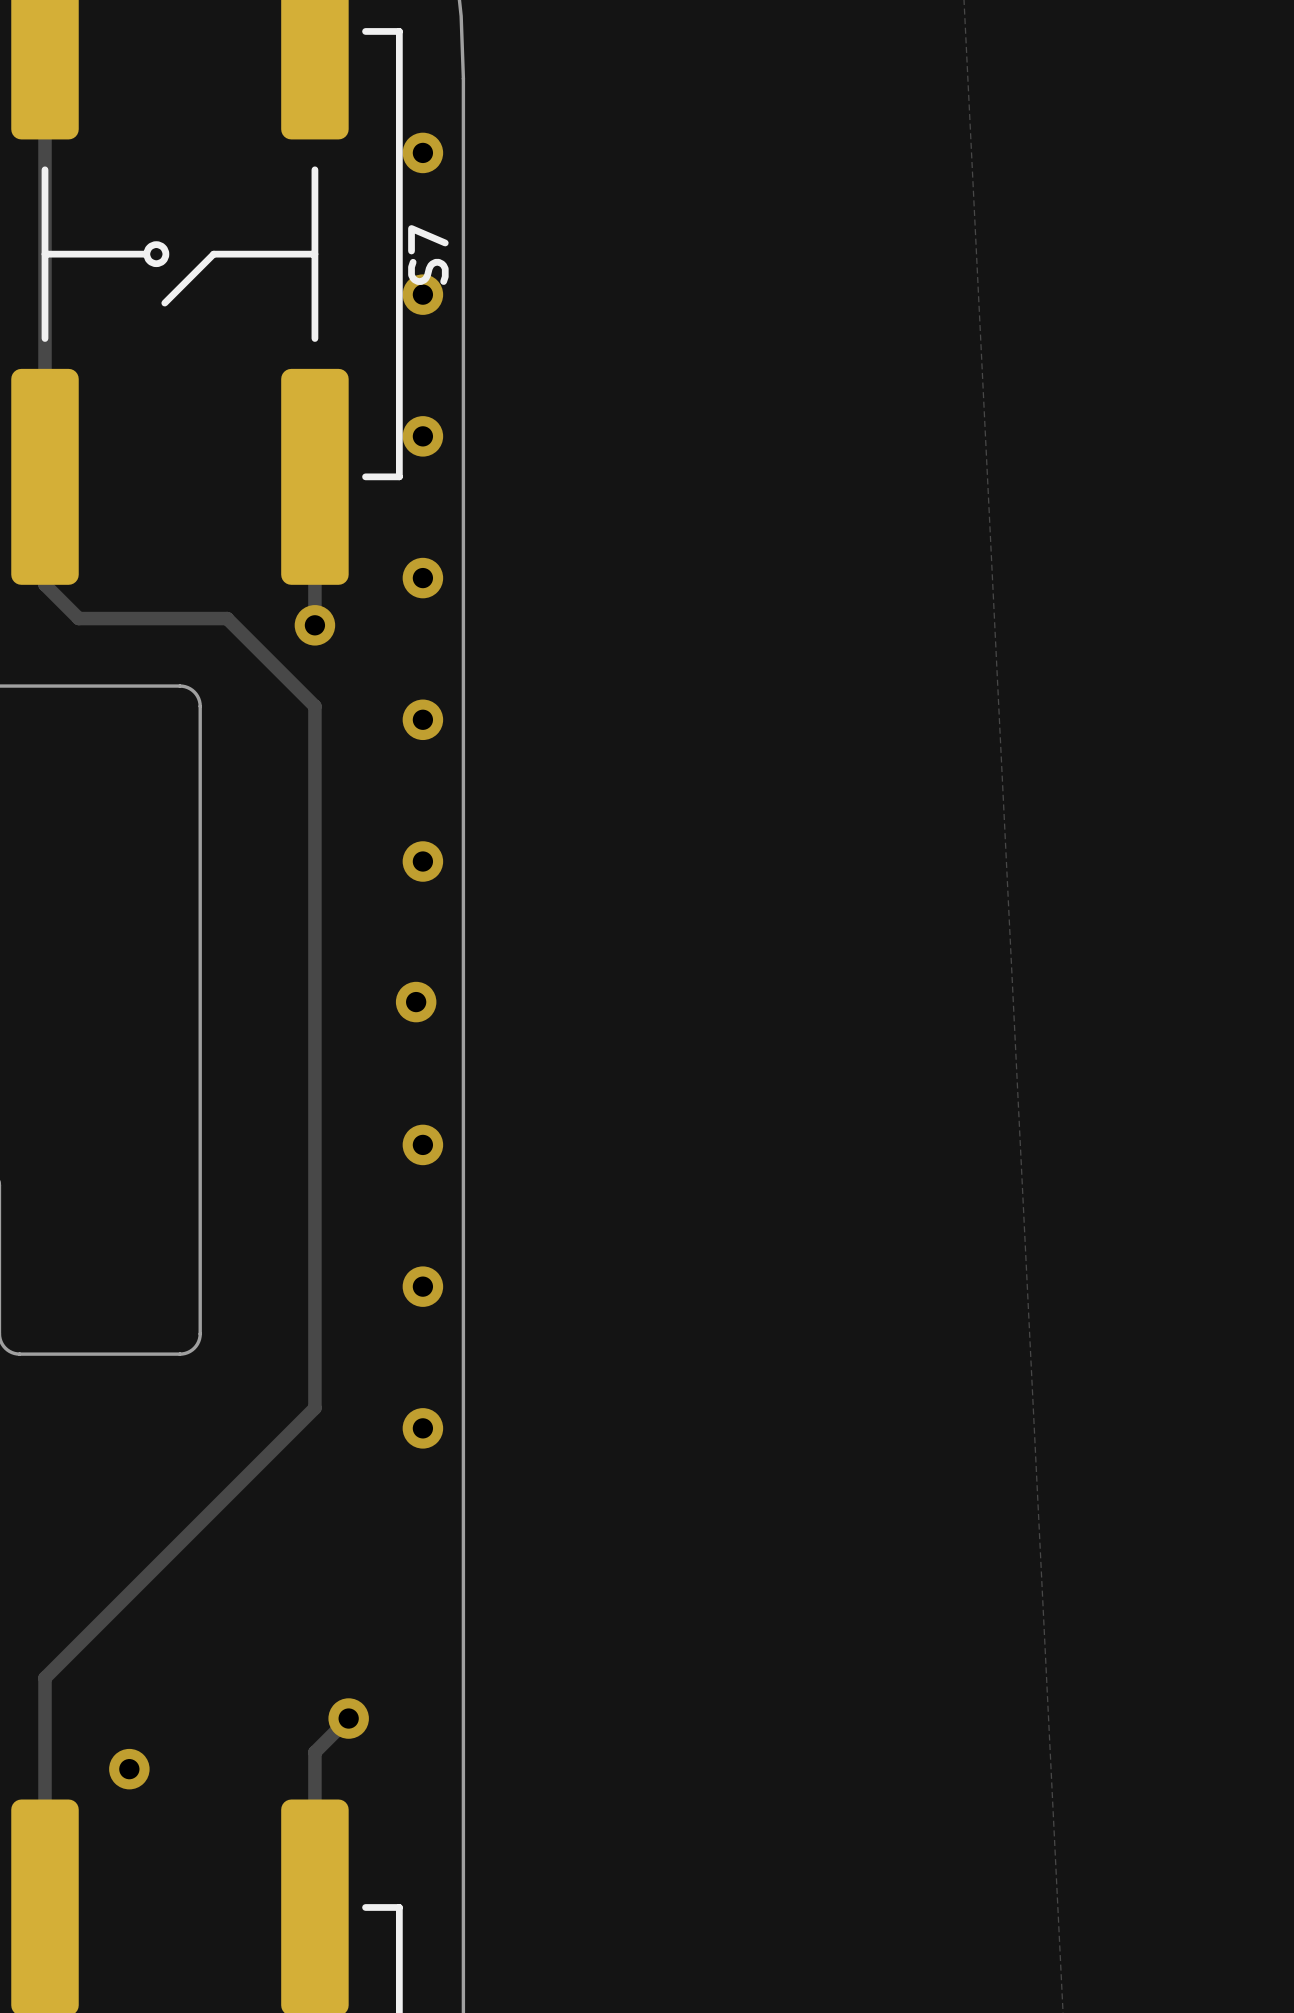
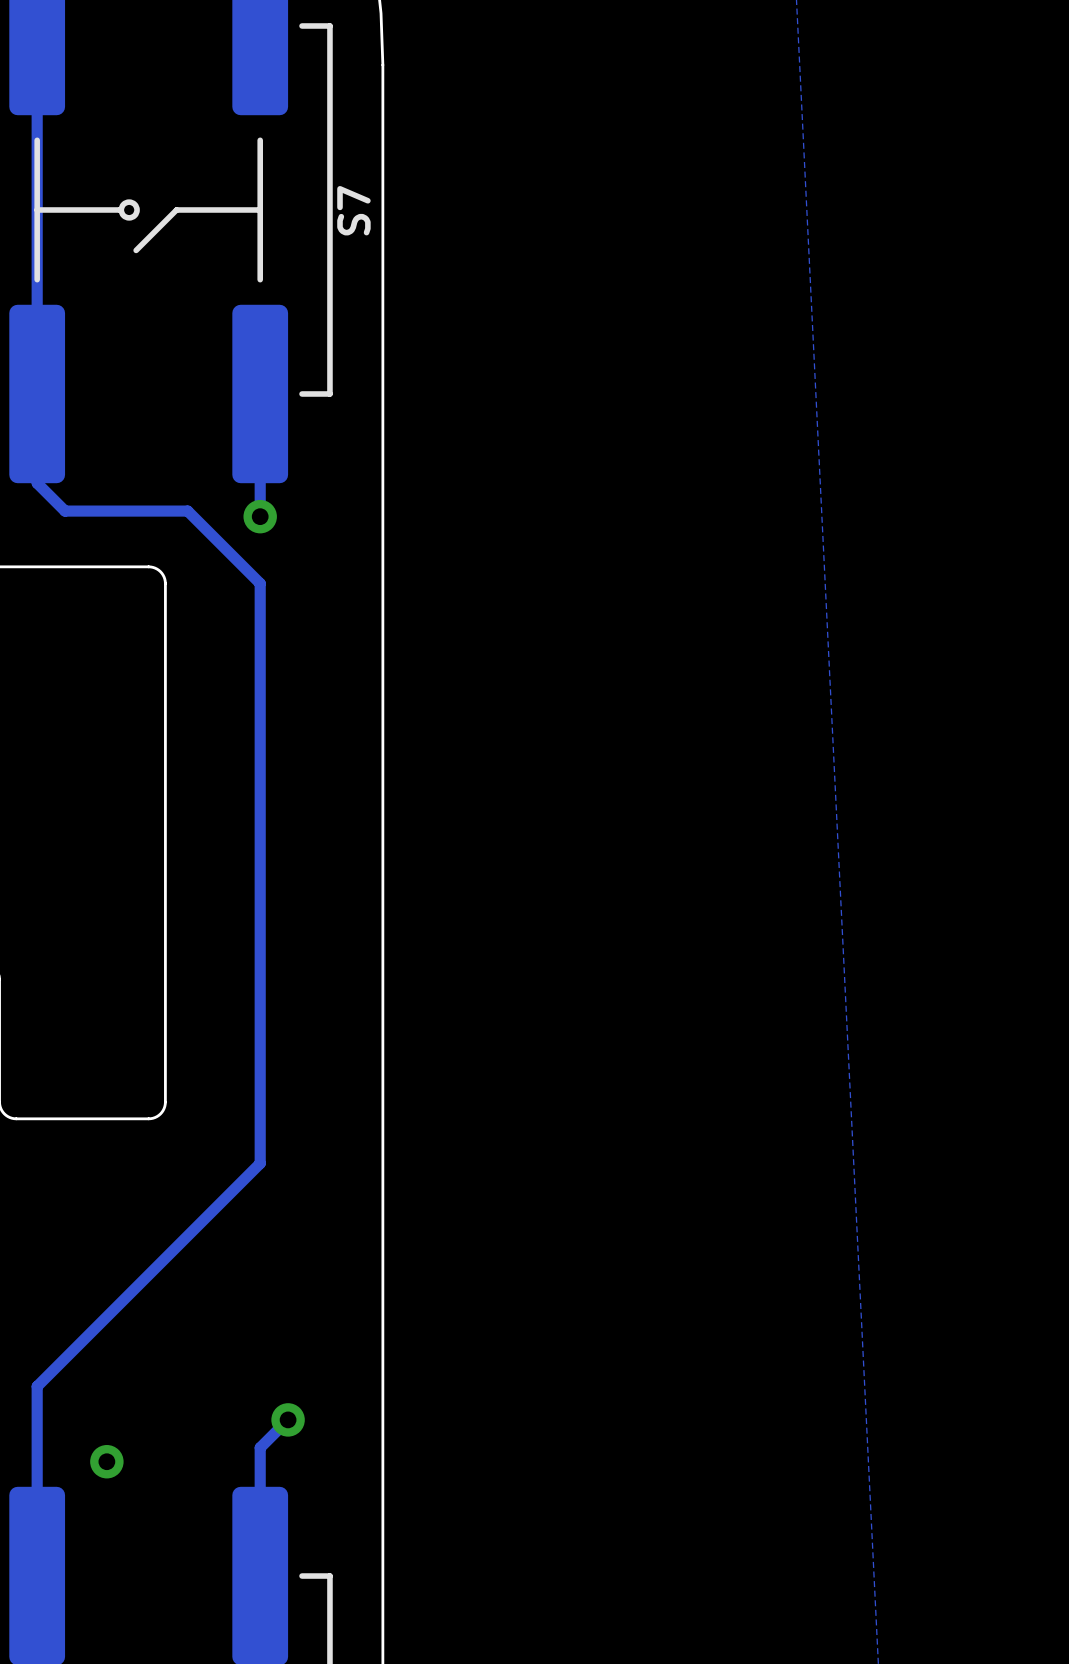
via: (422, 152) -> none
via: (422, 294) -> none
via: (422, 436) -> none
via: (422, 578) -> none
via: (422, 719) -> none
via: (422, 861) -> none
via: (416, 1002) -> none
via: (422, 1144) -> none
via: (422, 1286) -> none
via: (422, 1428) -> none

